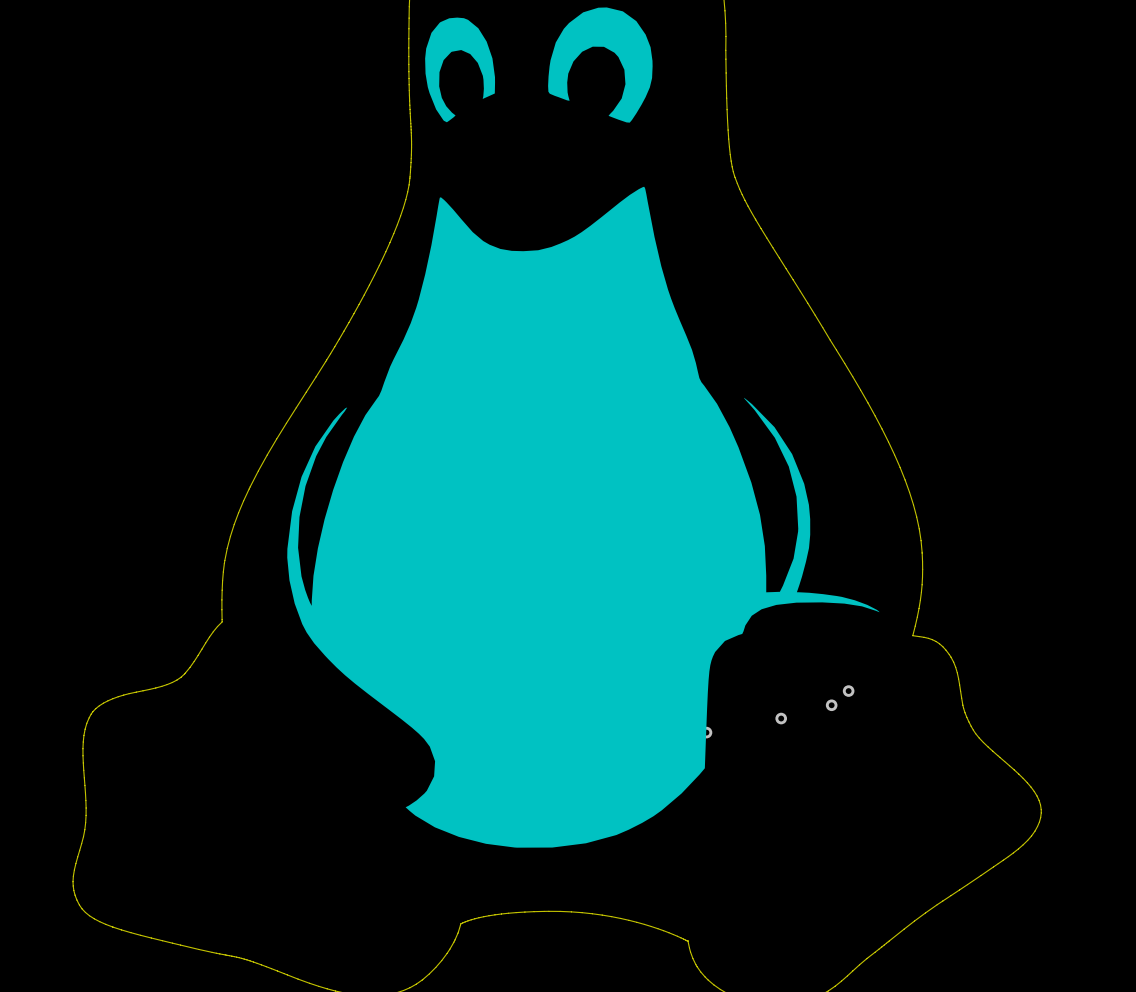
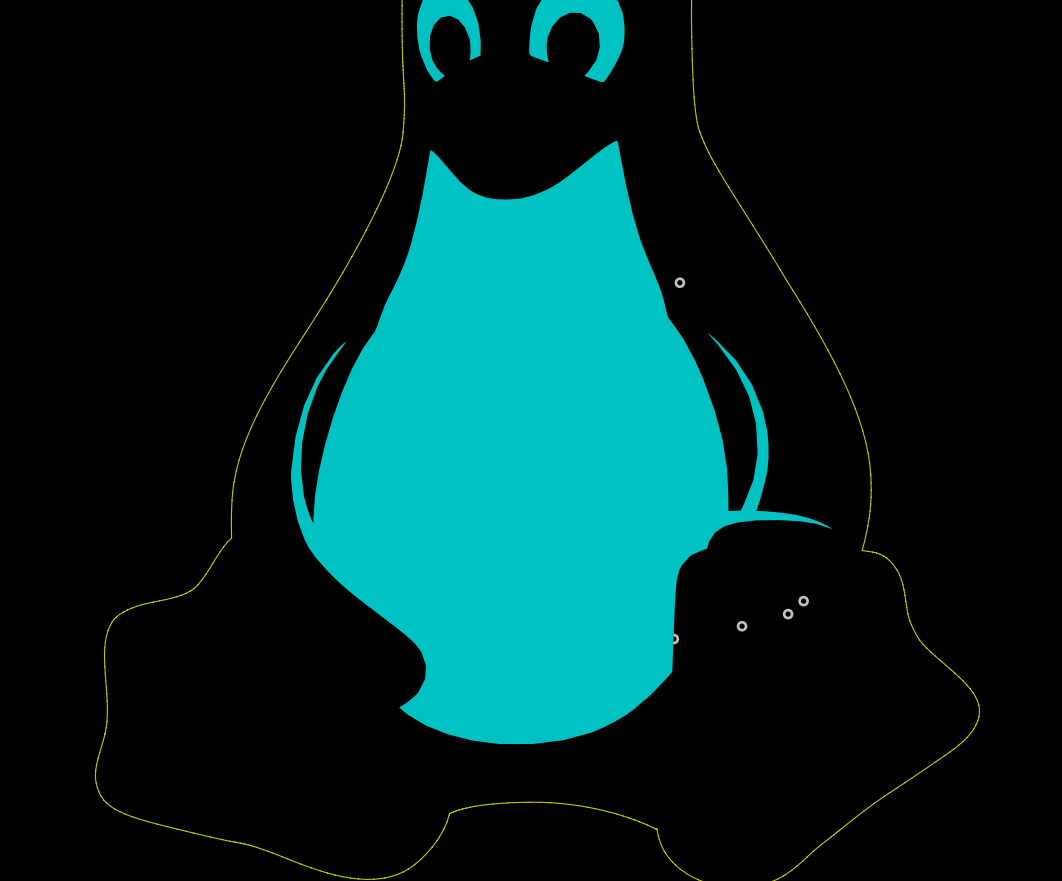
via: none -> (679, 282)

